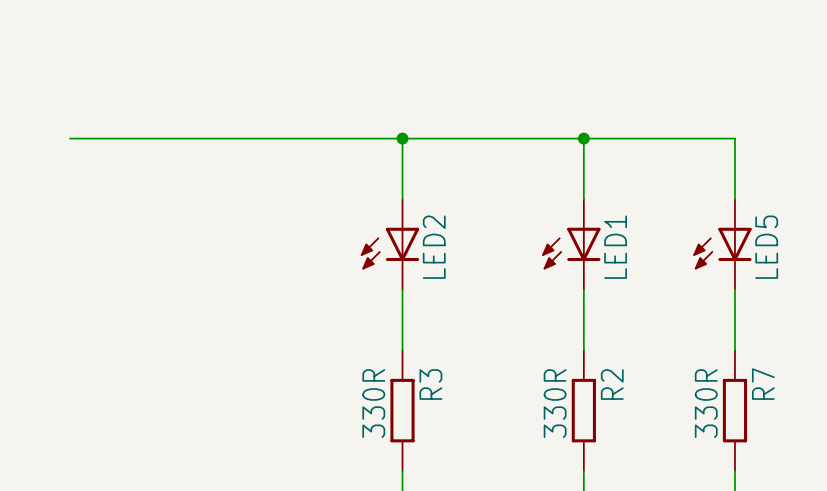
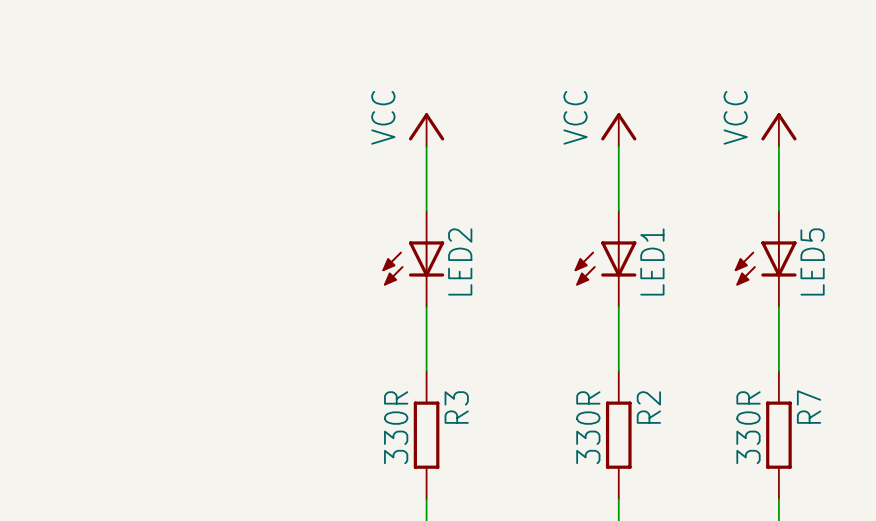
power symbol: none -> VCC (426, 130)
power symbol: none -> VCC (618, 130)
power symbol: none -> VCC (778, 130)
wire: (70, 138) (734, 138) -> none
junction: (402, 138) -> none
junction: (583, 138) -> none

